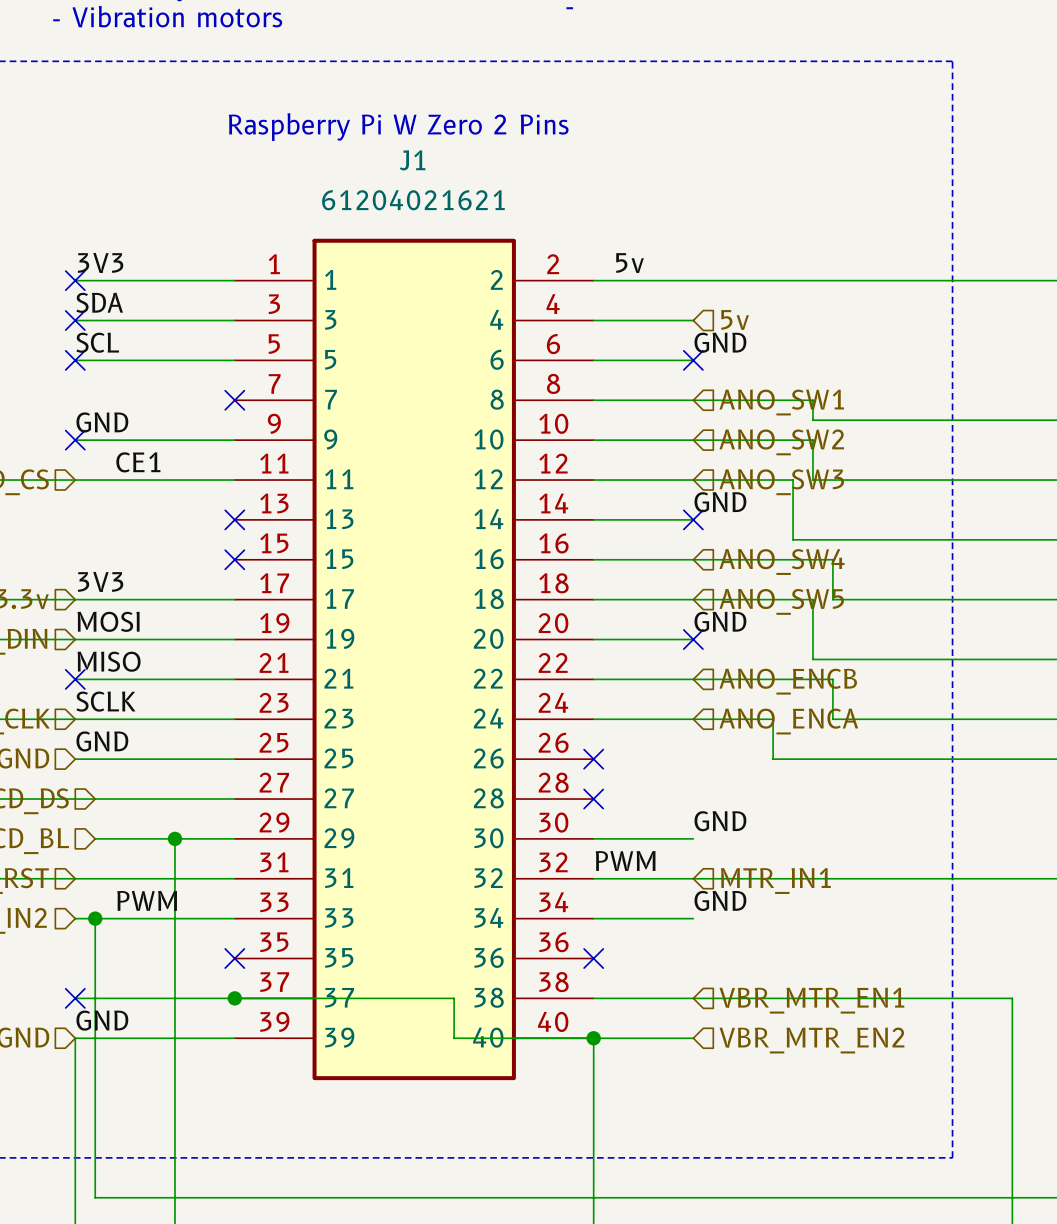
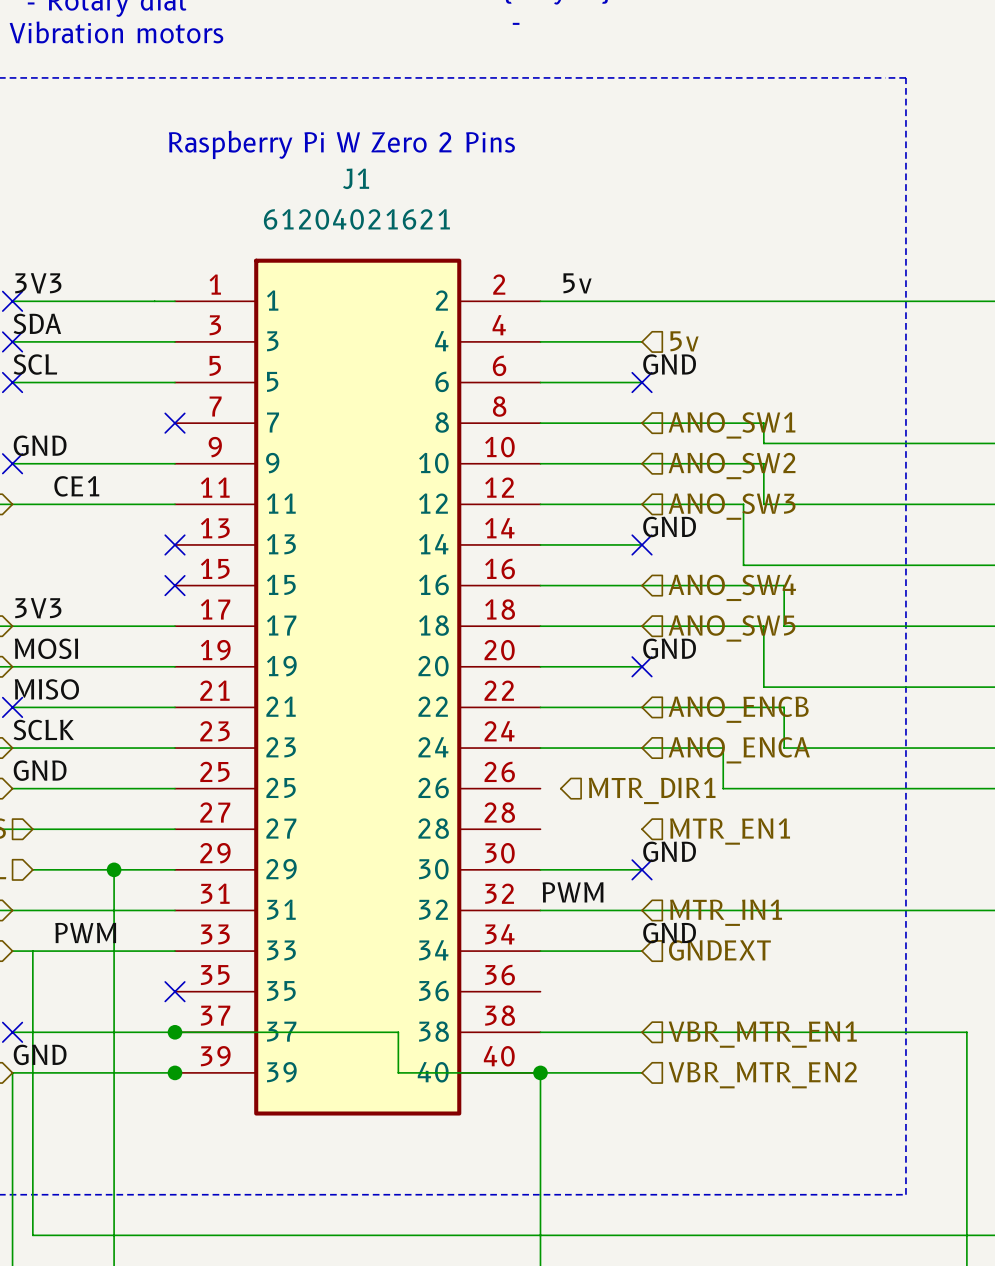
no-connect mark: (593, 759) -> none
hierarchical label: none -> MTR_DIR1 (652, 790)
no-connect mark: (593, 799) -> none
hierarchical label: none -> MTR_EN1 (730, 831)
no-connect mark: none -> (642, 869)
junction: (95, 918) -> none
hierarchical label: none -> GNDEXT (719, 950)
no-connect mark: (593, 958) -> none
junction: none -> (174, 1072)

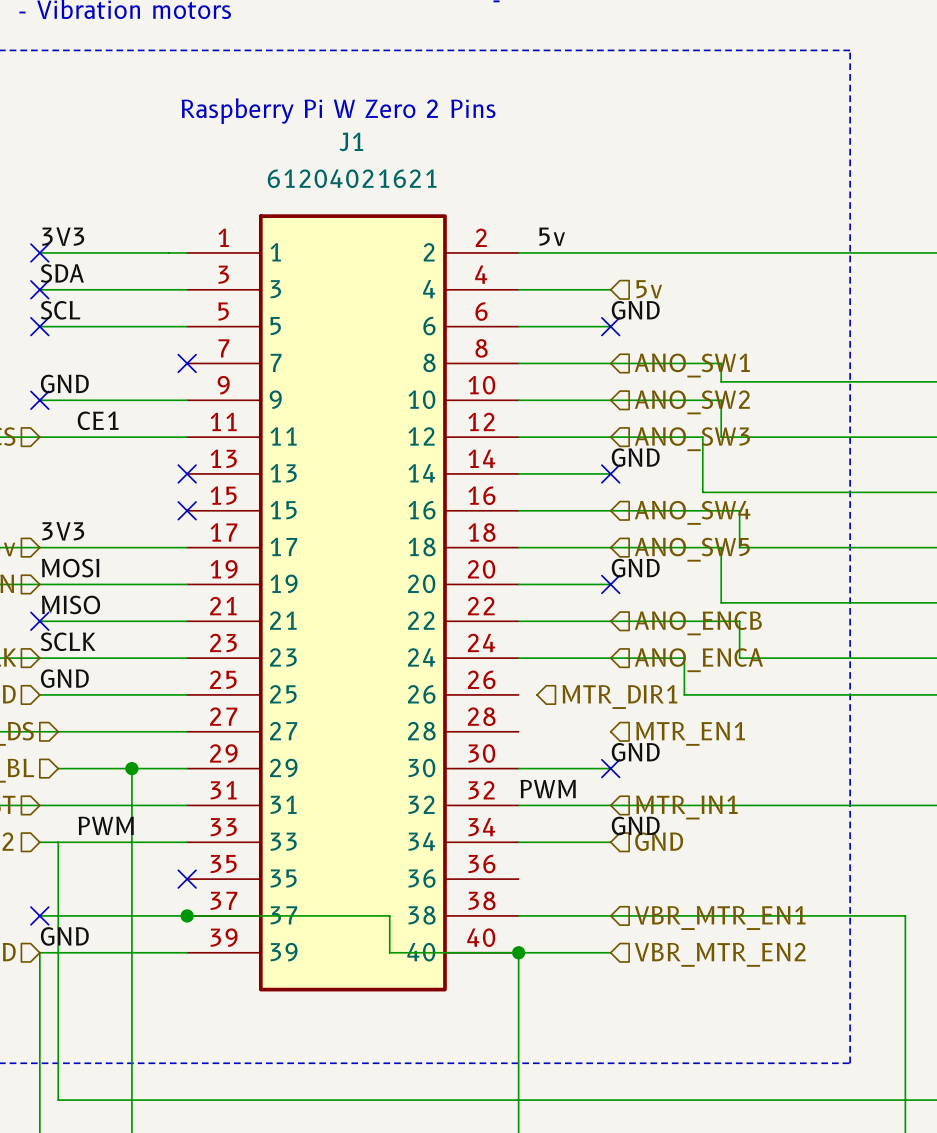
hierarchical label: GNDEXT (719, 950) -> GND (659, 841)
junction: (174, 1072) -> none

